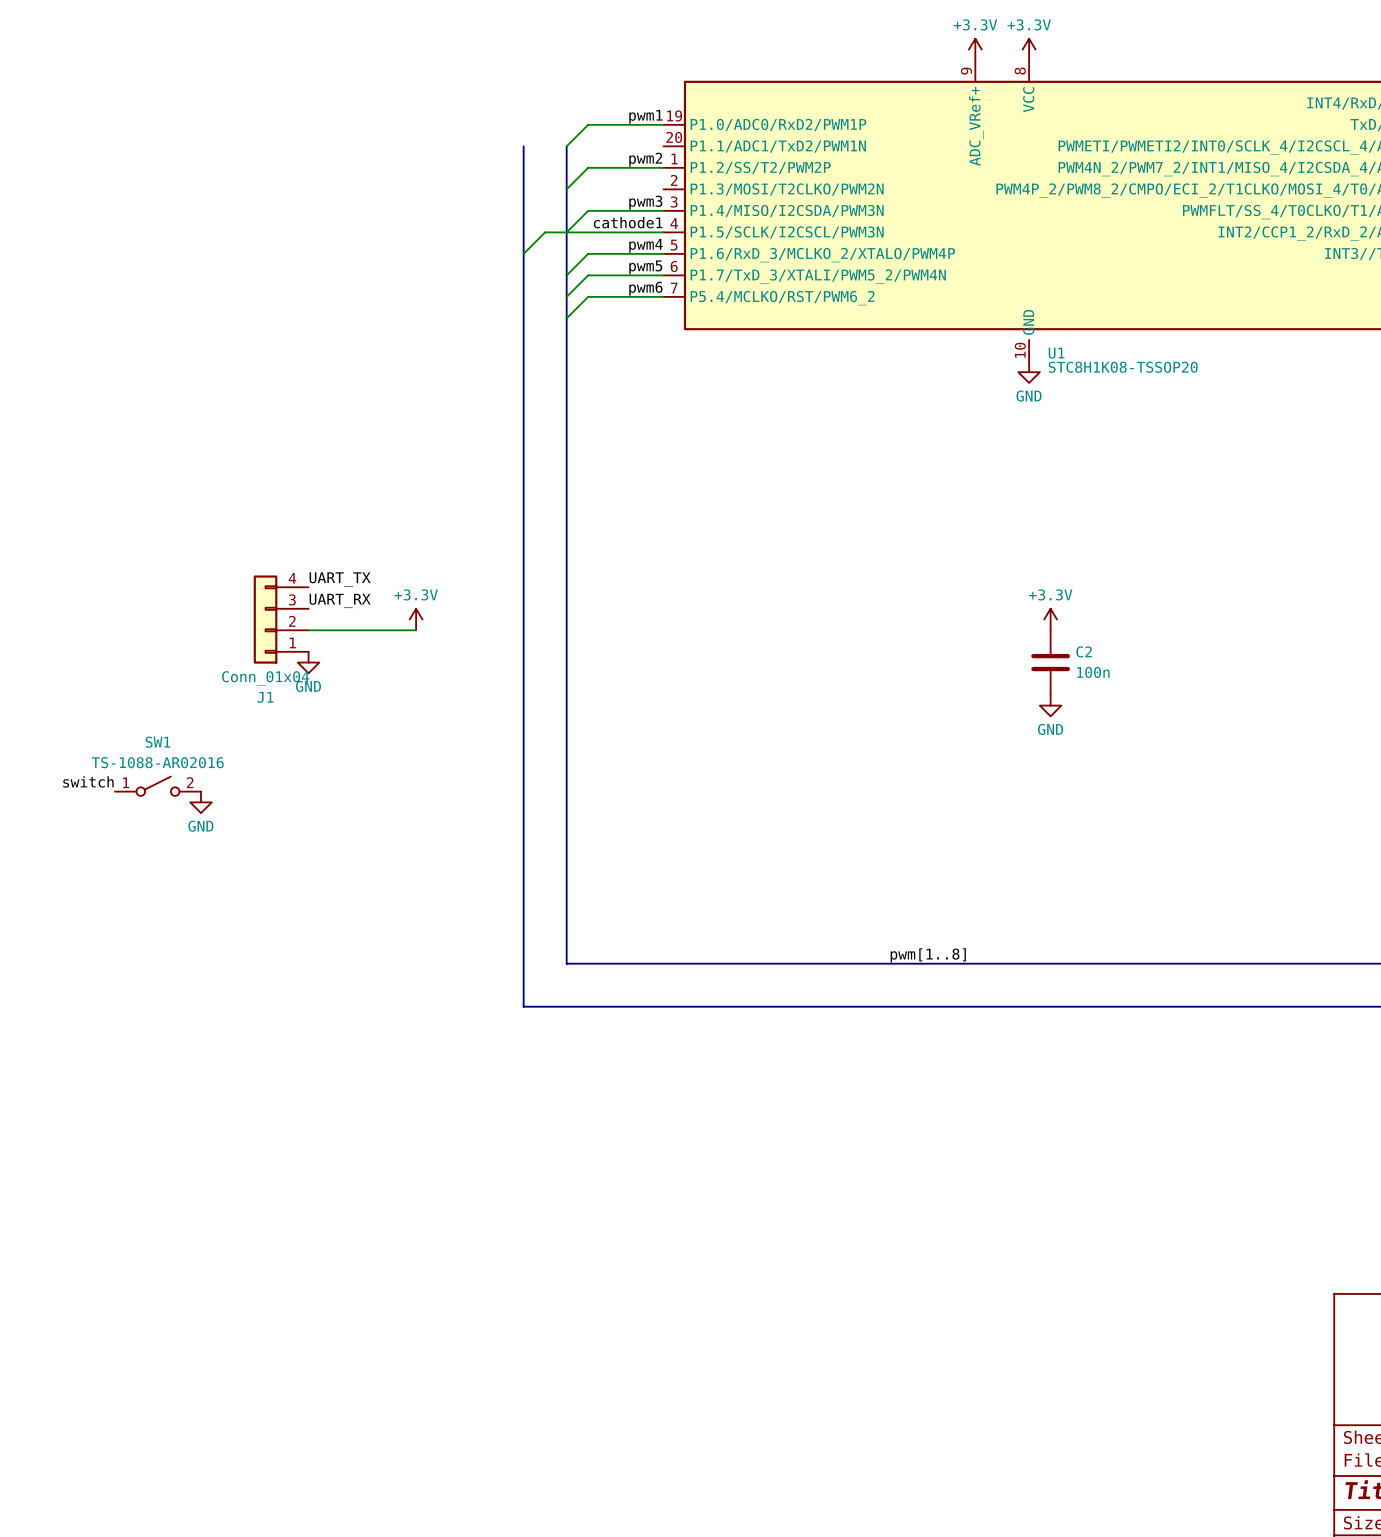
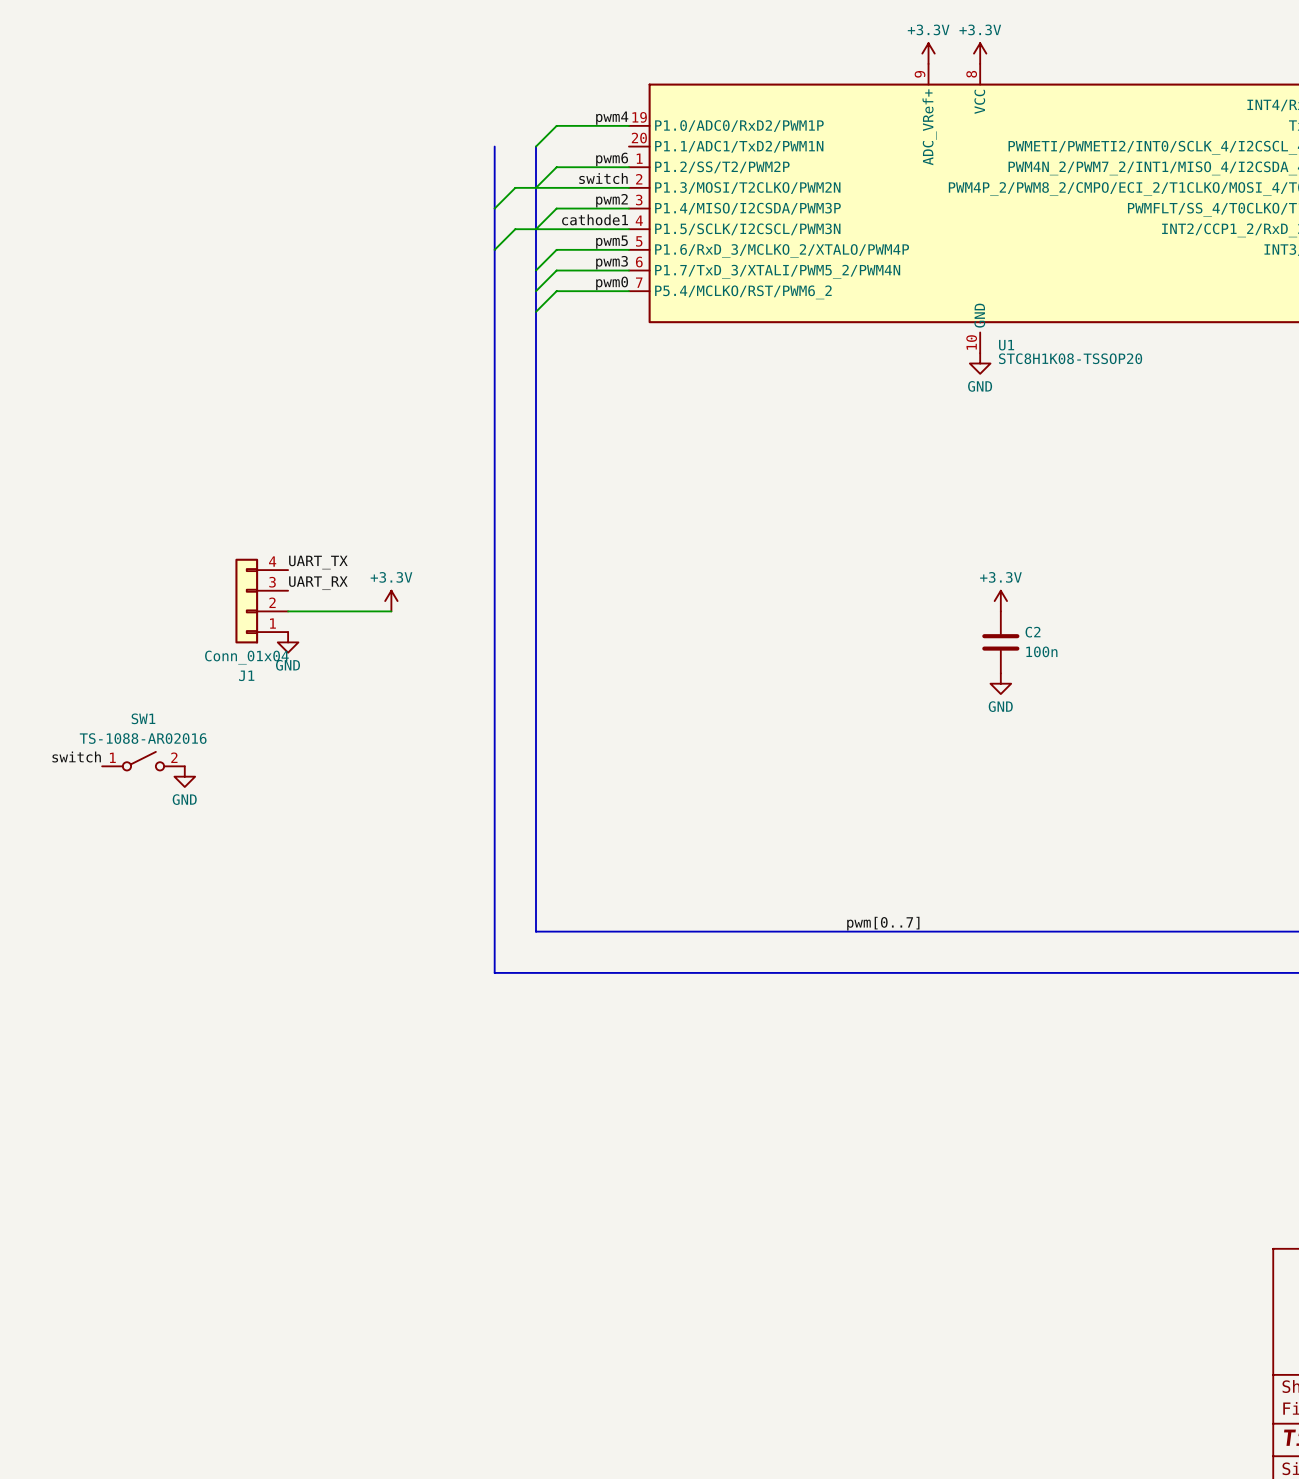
label: pwm1 (645, 116) -> pwm4 (612, 118)
label: pwm2 (645, 159) -> pwm6 (612, 159)
label: none -> switch (603, 178)
wire: none -> (628, 187) (515, 187) (494, 208)
label: pwm3 (645, 202) -> pwm2 (611, 200)
U1 pin name: P1.4/MISO/I2CSDA/PWM3N (787, 211) -> P1.4/MISO/I2CSDA/PWM3P (747, 208)
label: pwm4 (646, 245) -> pwm5 (612, 242)
label: pwm5 (645, 267) -> pwm3 (612, 262)
label: pwm6 (645, 288) -> pwm0 (612, 283)
label: pwm[1..8] (928, 955) -> pwm[0..7] (883, 923)

